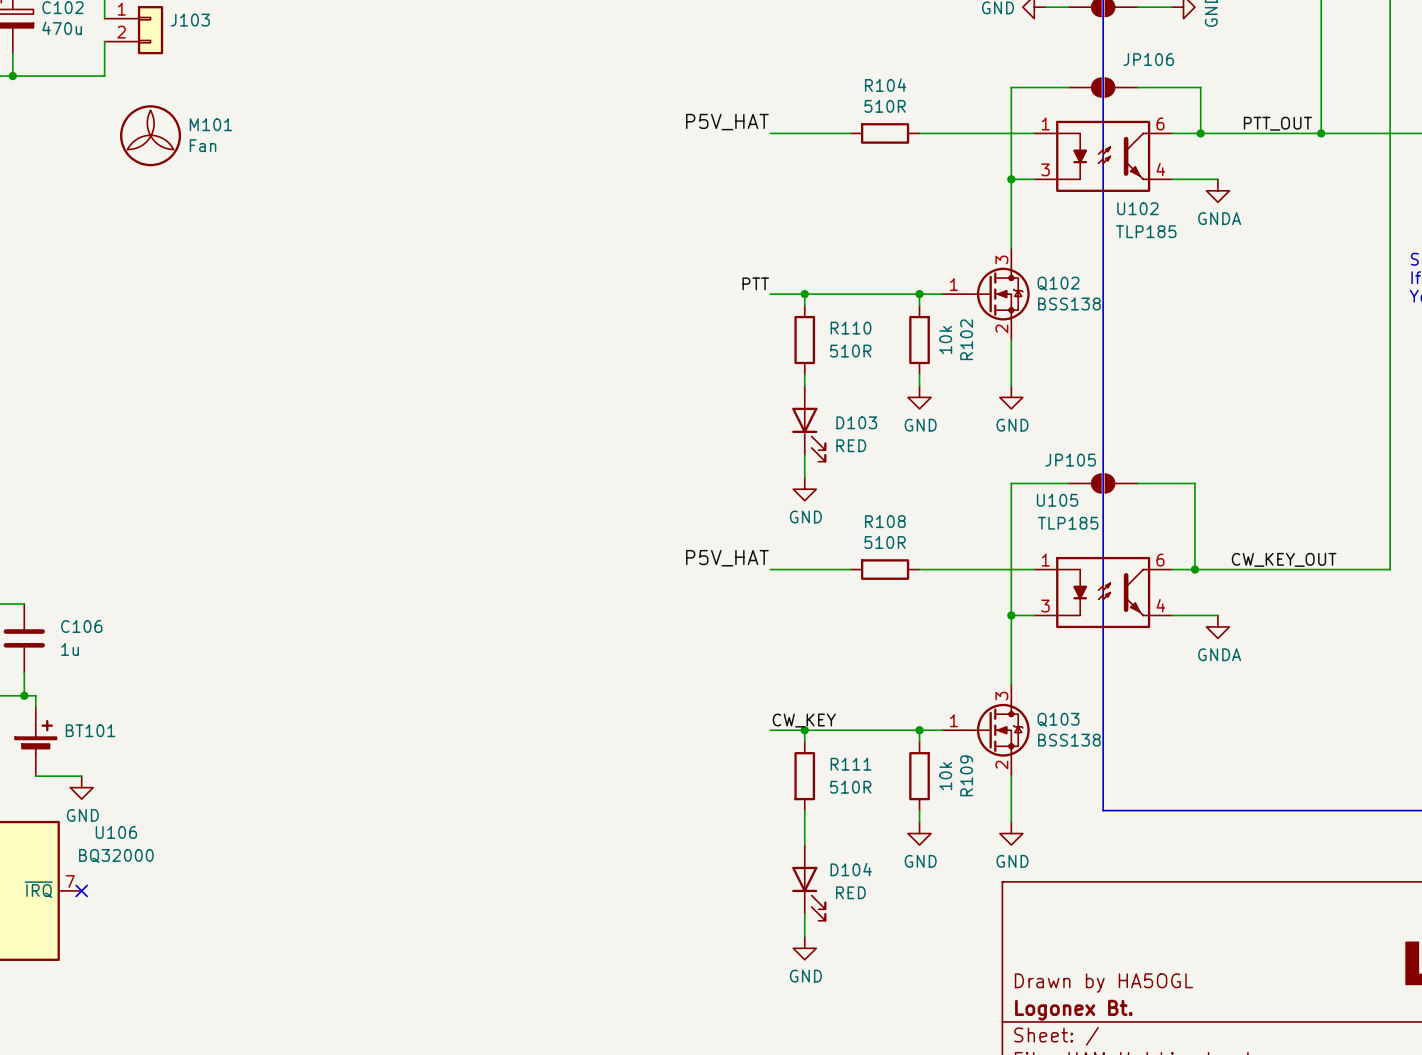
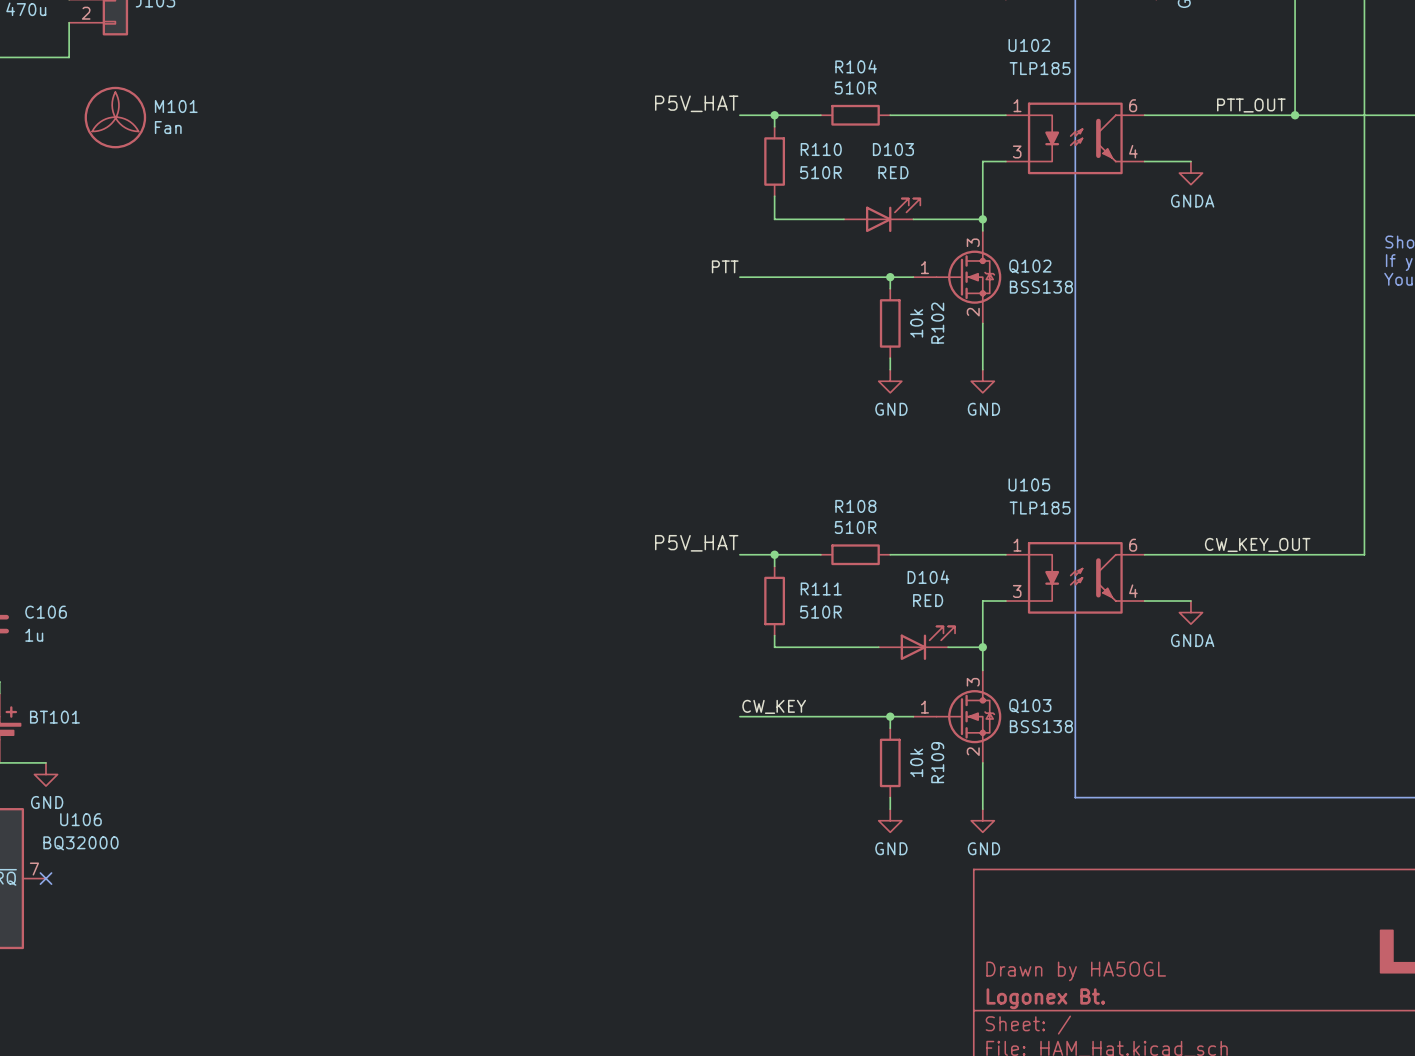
wire: (1068, 87) (1011, 87) (1011, 179) -> none
JP106: (1103, 87) -> none
wire: (1137, 87) (1200, 87) (1200, 133) -> none
junction: none -> (774, 115)
junction: (1200, 133) -> none
junction: (1011, 179) -> none
U102 name position: U102 (1137, 208) -> U102 (1029, 45)
wire: none -> (774, 196) (774, 219) (844, 219)
U102 value position: TLP185 (1146, 231) -> TLP185 (1040, 68)
wire: none -> (913, 219) (982, 219)
junction: none -> (982, 219)
wire: (804, 294) (804, 305) -> (774, 115) (774, 126)
junction: (804, 294) -> none
R110 position: (804, 340) -> (774, 161)
wire: (804, 374) (804, 385) -> none
D103 name position: D103 (856, 422) -> D103 (893, 149)
D103 position: (808, 423) -> (882, 215)
D103 rotation: 0° (808, 434) -> 90° counterclockwise (893, 215)
wire: (804, 454) (804, 477) -> none
wire: (1068, 483) (1011, 483) (1011, 615) -> none
JP105: (1103, 483) -> none
wire: (1137, 483) (1194, 483) (1194, 569) -> none
power symbol: GND (804, 489) -> none
junction: none -> (774, 554)
junction: (1194, 569) -> none
junction position: (1011, 615) -> (982, 647)
wire: none -> (774, 635) (774, 647) (878, 647)
wire: none -> (948, 647) (982, 647)
wire: (804, 730) (804, 741) -> (774, 554) (774, 566)
junction: (804, 730) -> none
R111 position: (804, 776) -> (774, 601)
wire: (804, 810) (804, 845) -> none
D104 name position: D104 (851, 869) -> D104 (928, 577)
D104 position: (808, 882) -> (916, 643)
D104 rotation: 0° (808, 893) -> 90° counterclockwise (927, 643)
wire: (804, 913) (804, 936) -> none
power symbol: GND (804, 948) -> none

